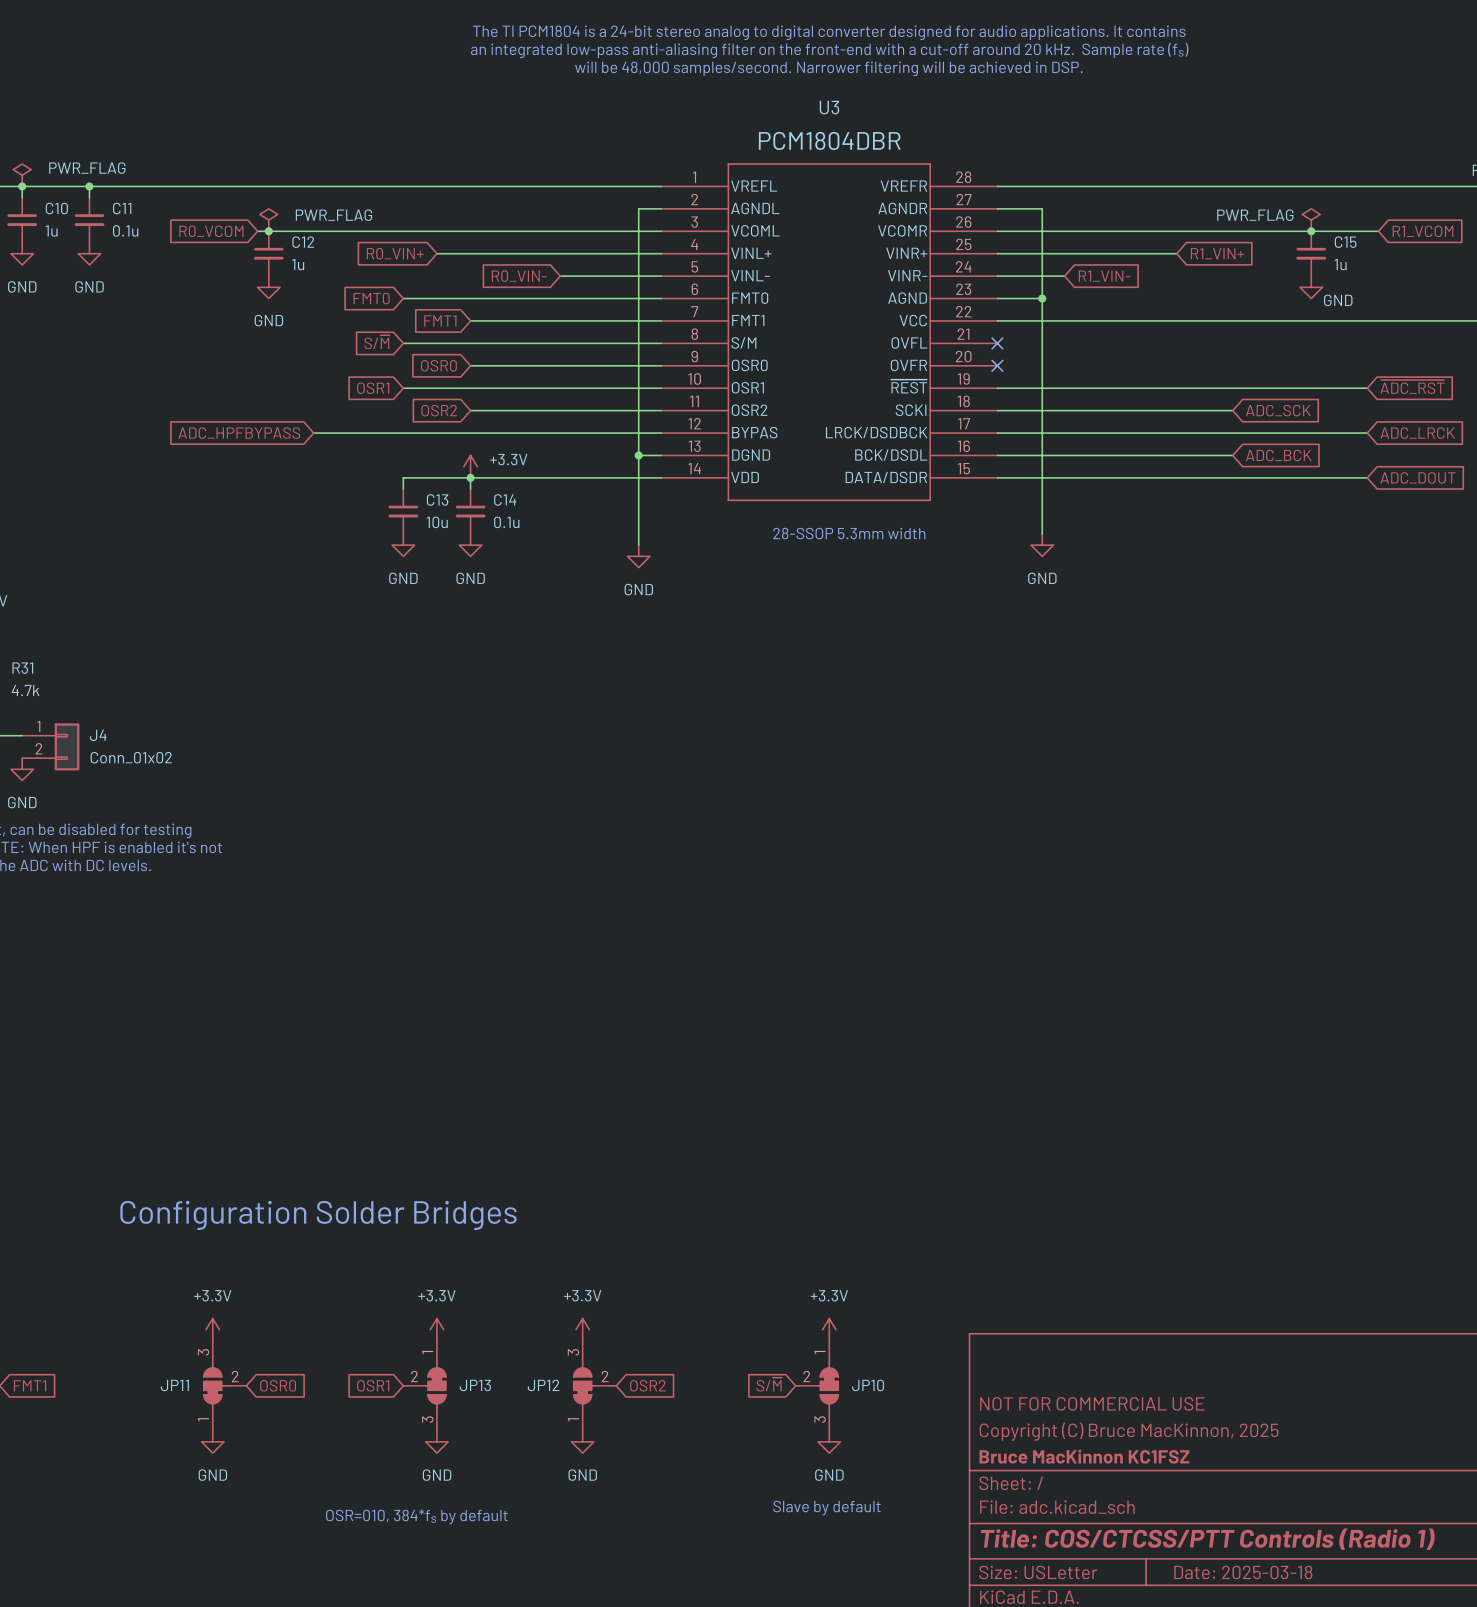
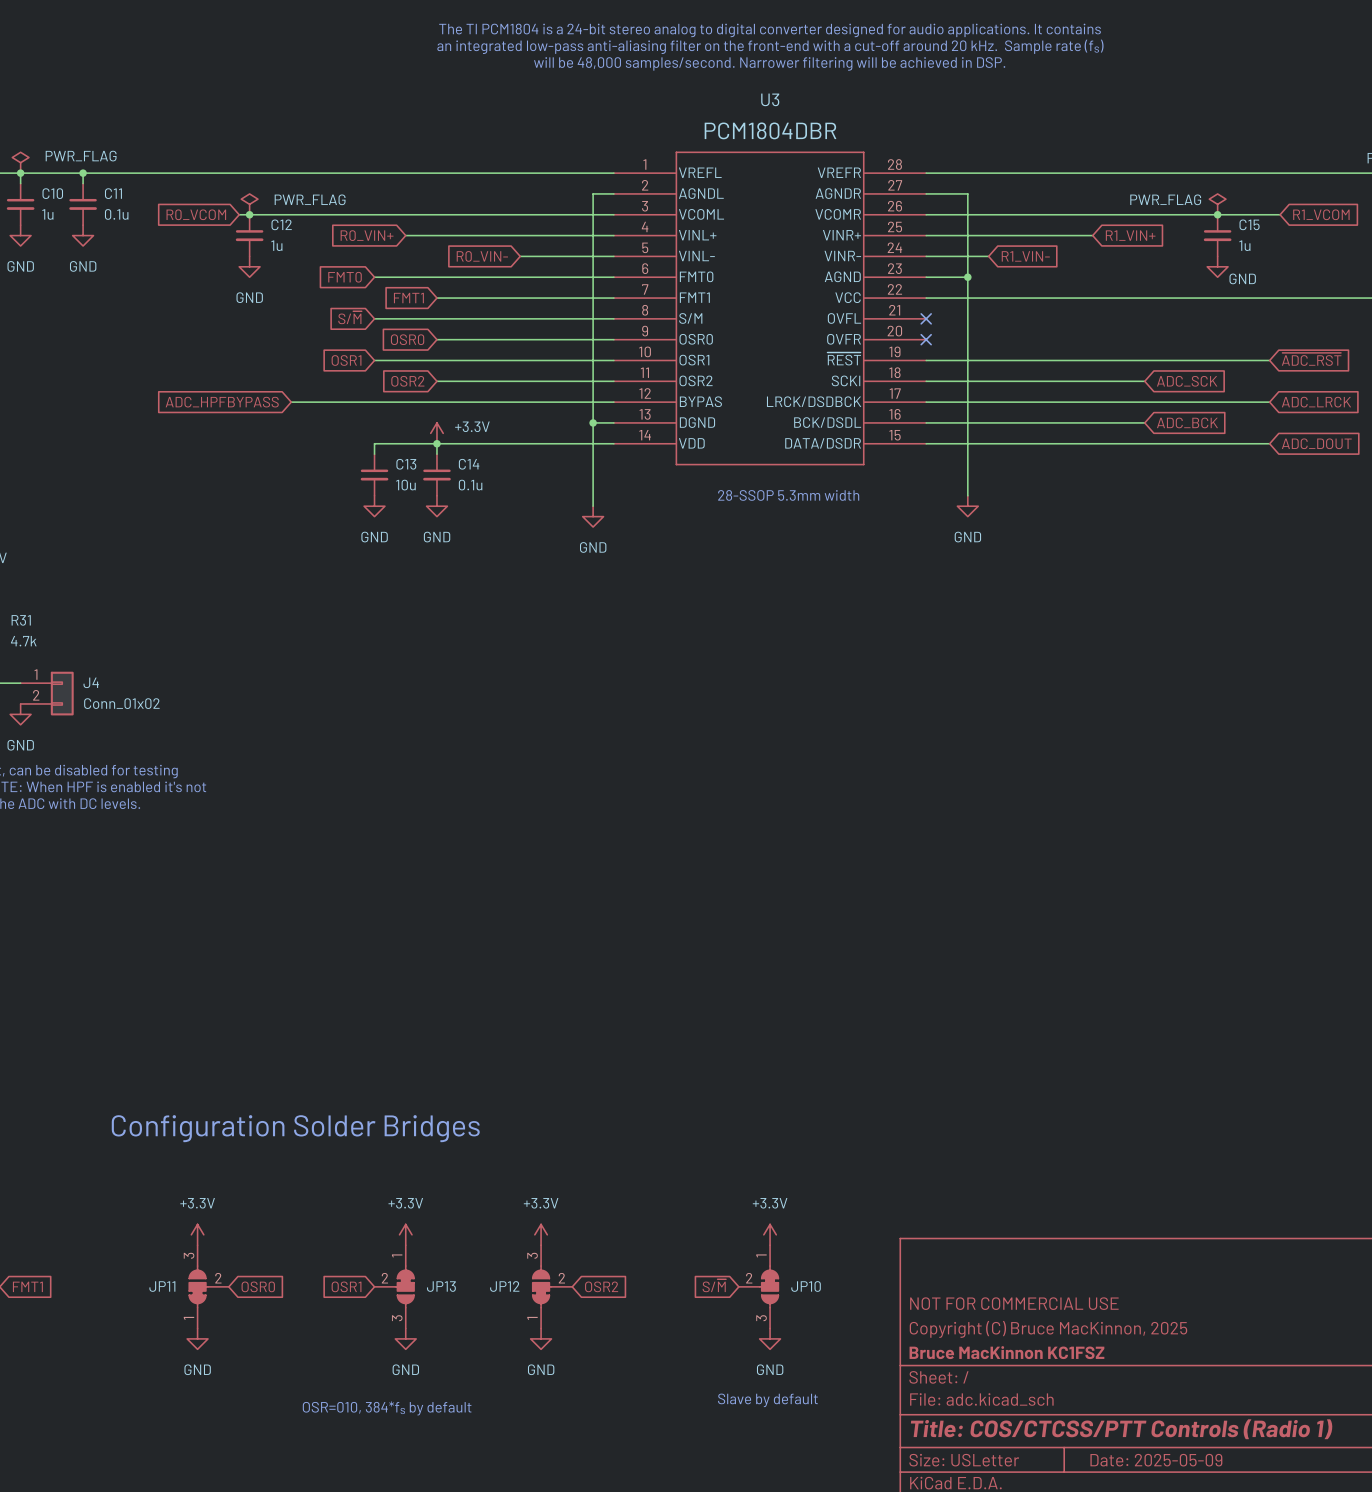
title block: Date: 2025-03-18 (1243, 1572) -> Date: 2025-05-09 (1156, 1460)

